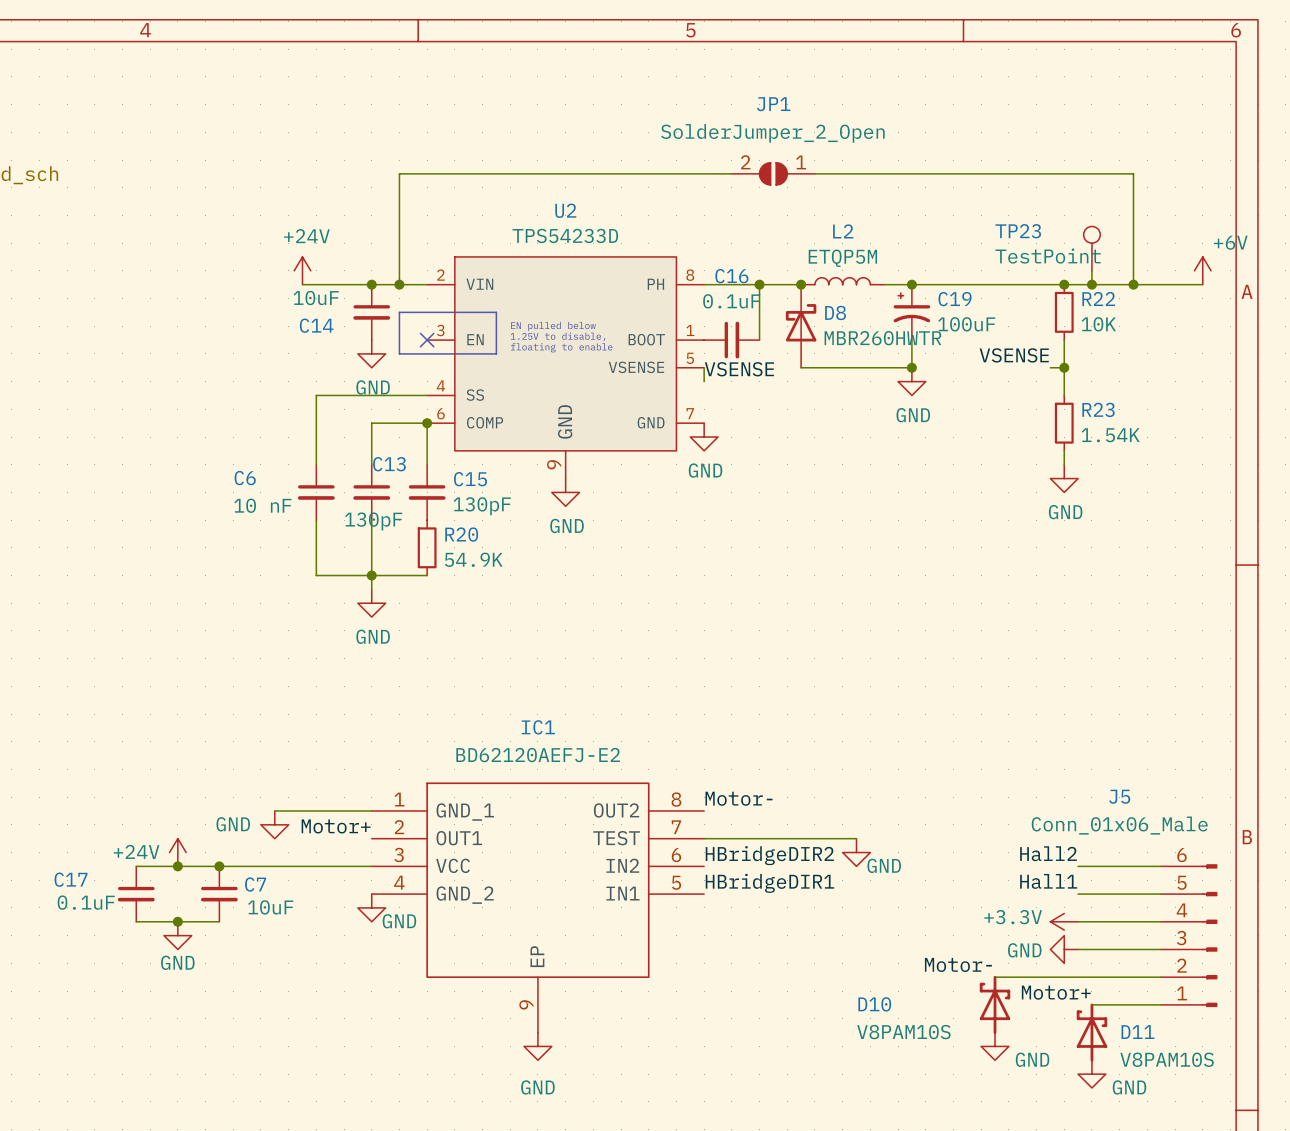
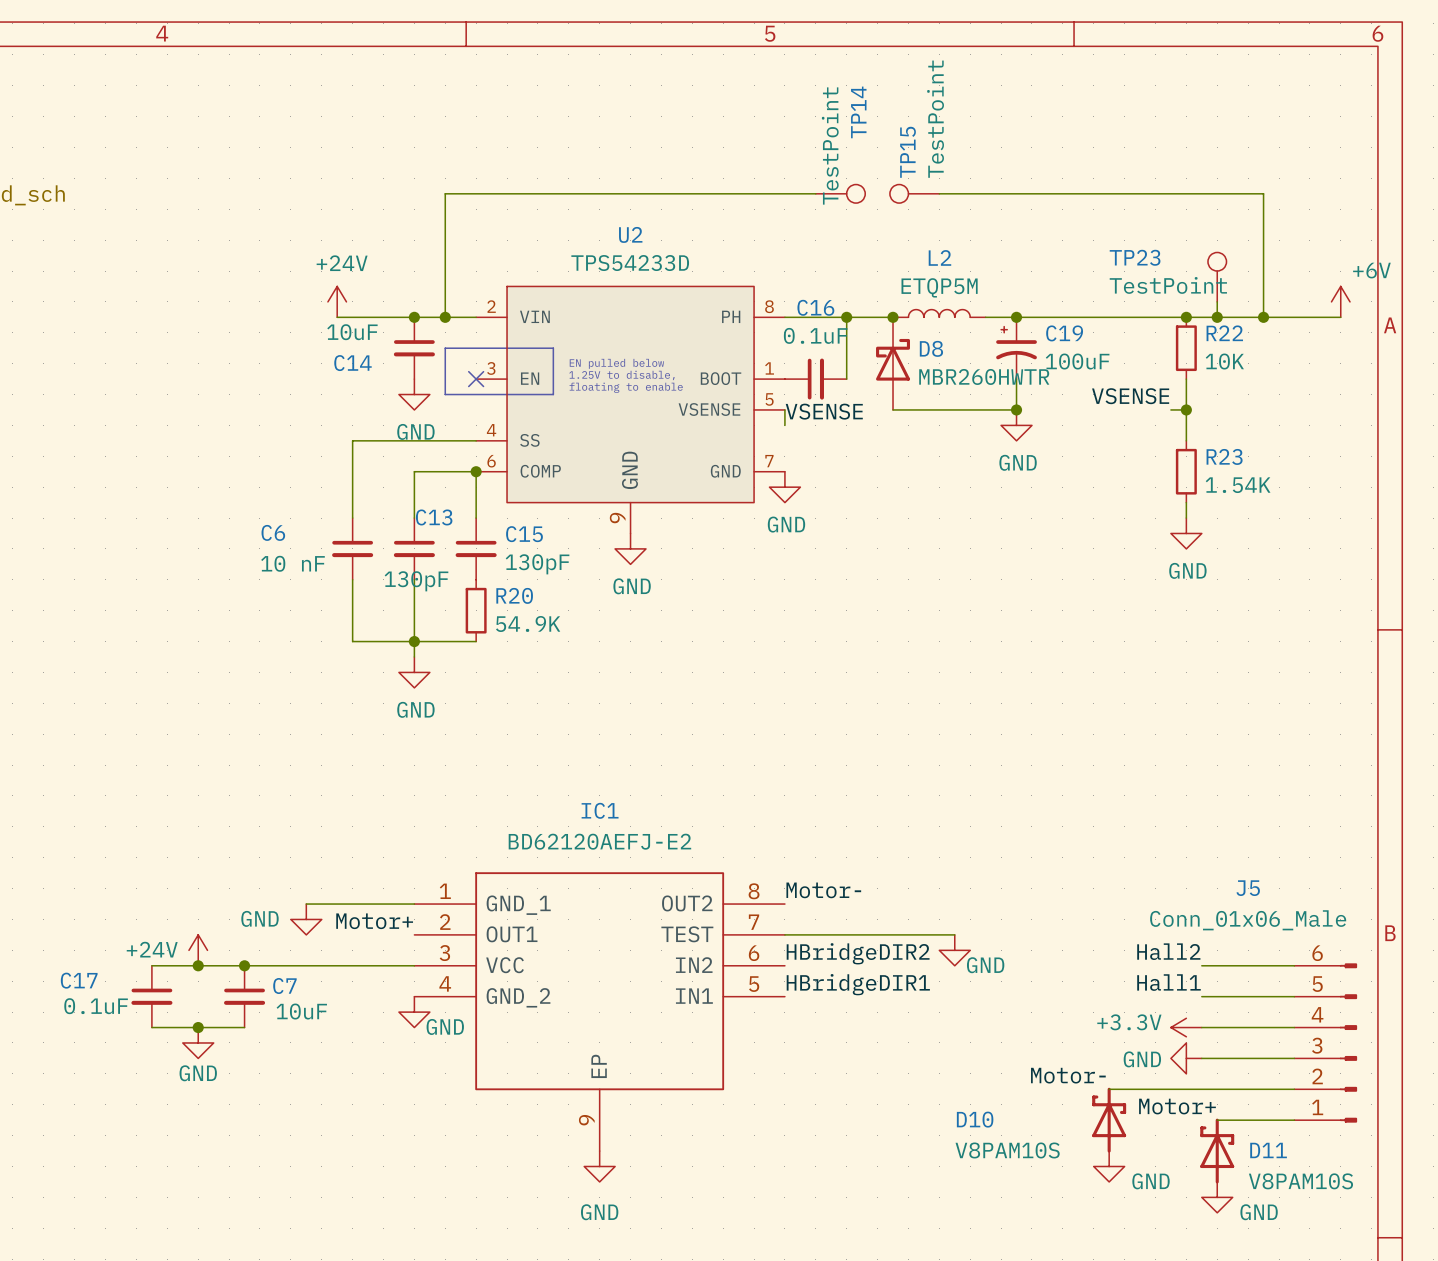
TP14: none -> TestPoint (840, 193)
JP1: SolderJumper_2_Open (773, 173) -> none
TP15: none -> TestPoint (914, 193)

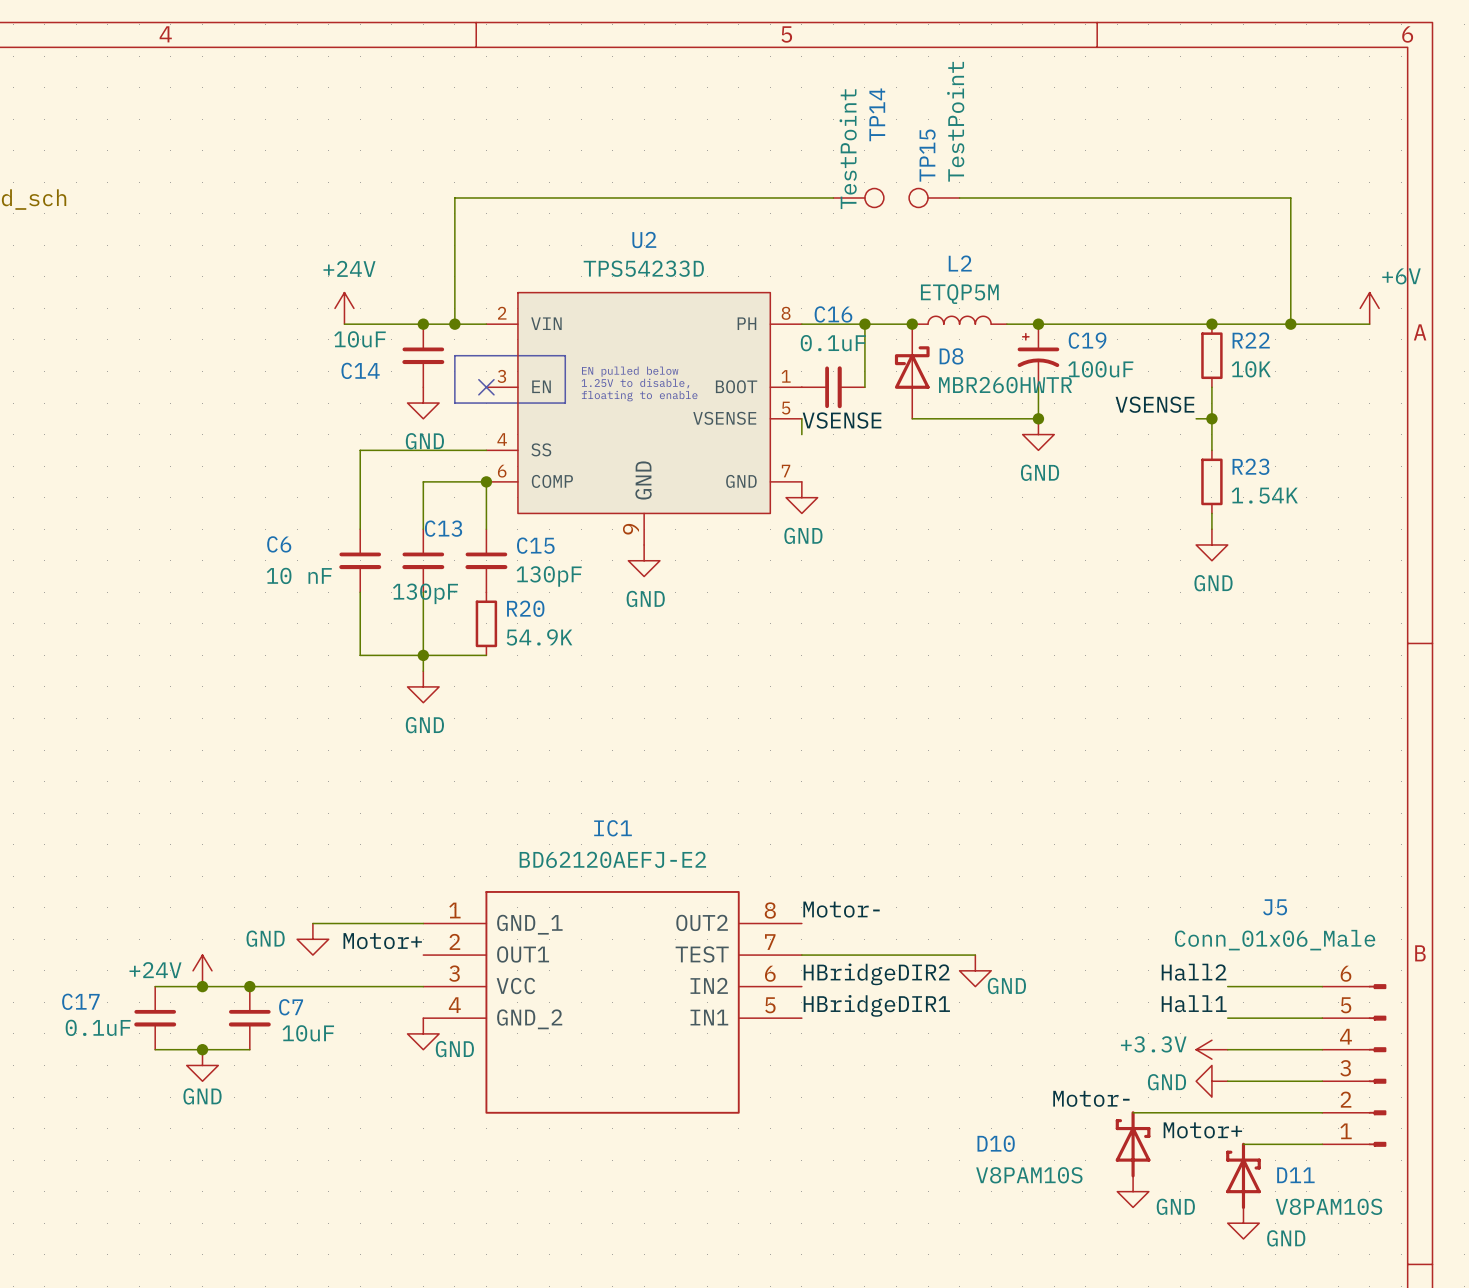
TP23: TestPoint (1217, 277) -> none
wire: (1217, 301) (1217, 317) -> none
junction: (1217, 317) -> none
IC1 symbol: [414, 872, 785, 1152] -> [423, 891, 802, 1114]
power symbol: GND (599, 1166) -> none

